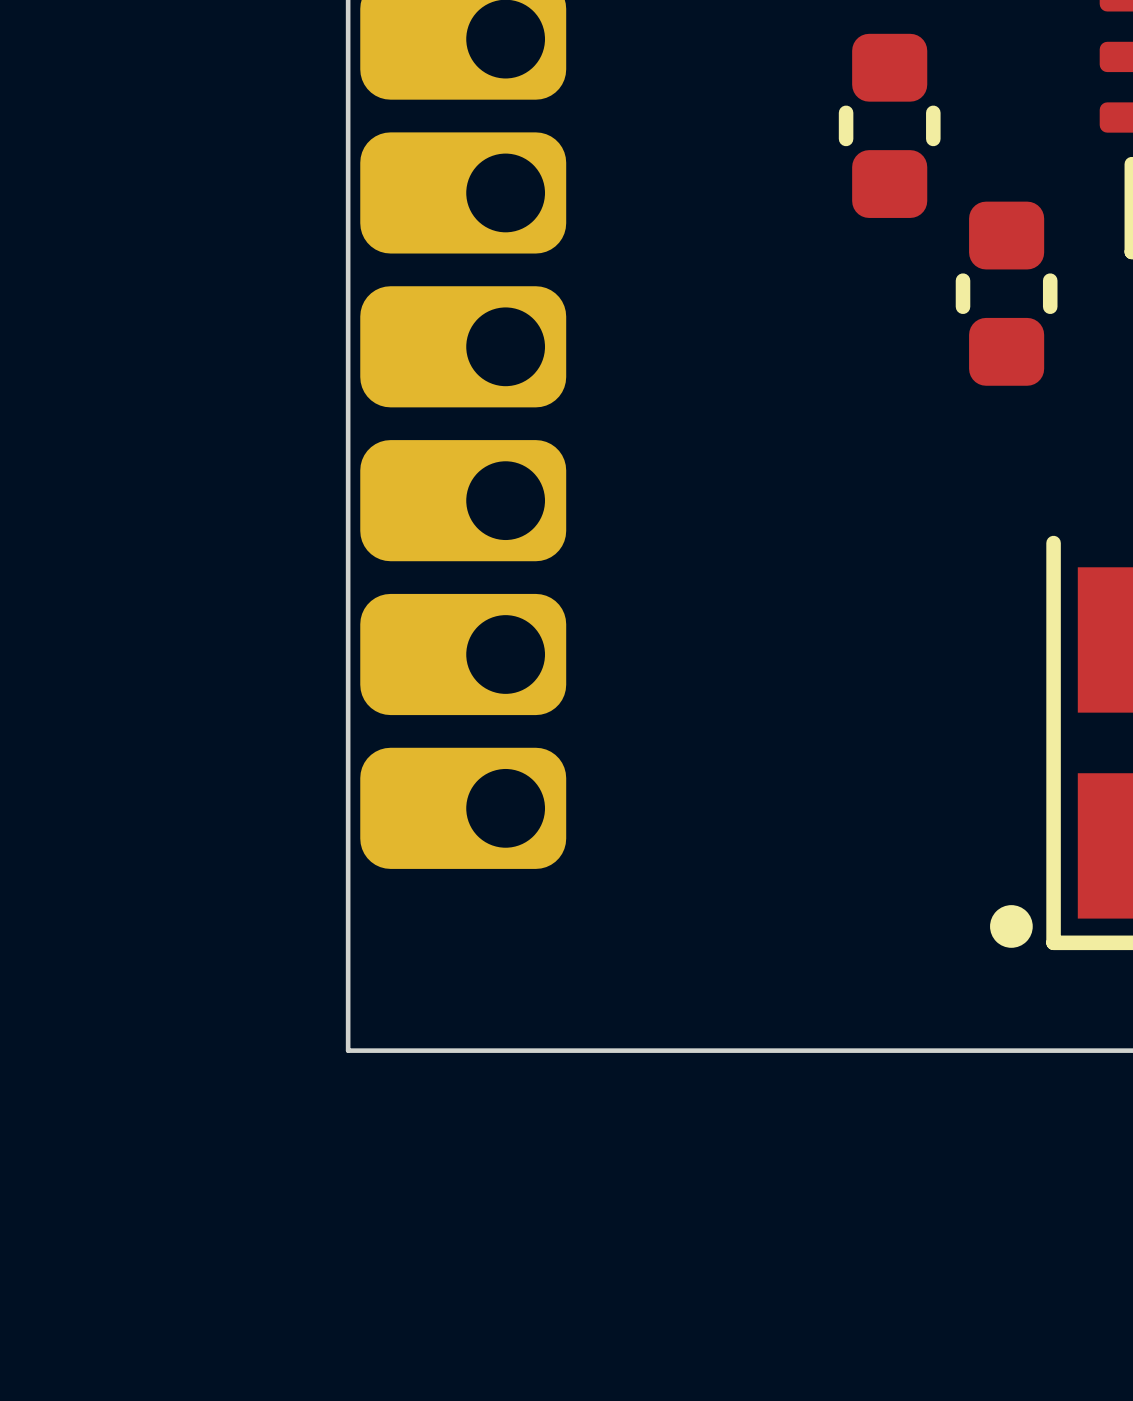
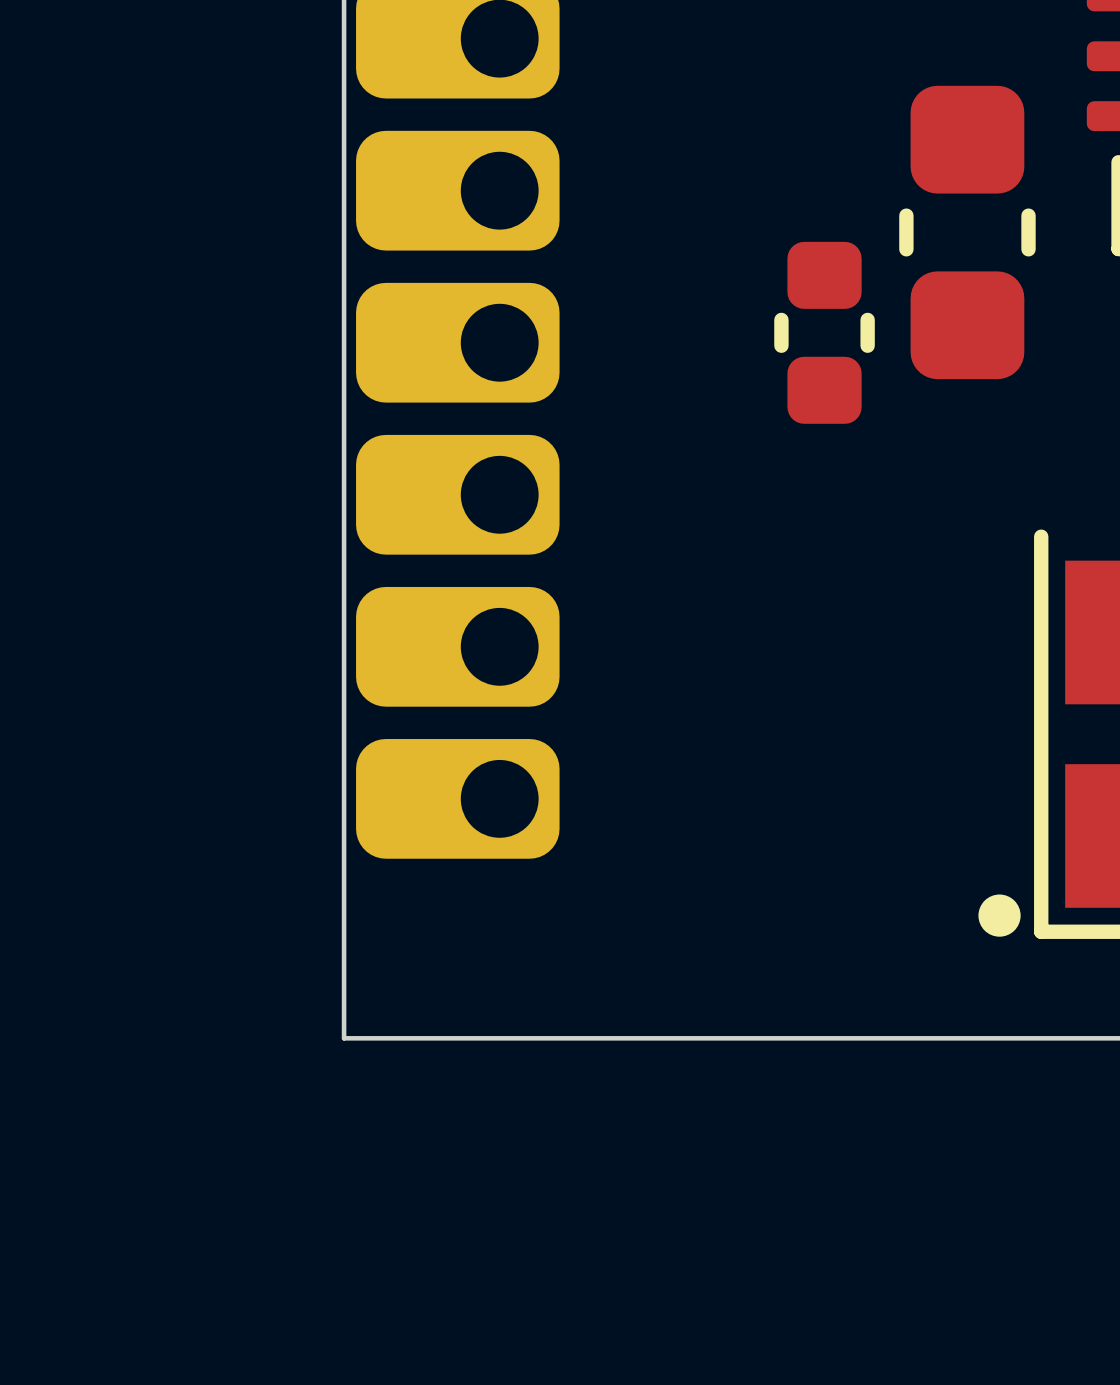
part position: (889, 125) -> (824, 332)
part footprint: [955, 201, 1058, 386] -> [899, 85, 1036, 380]

